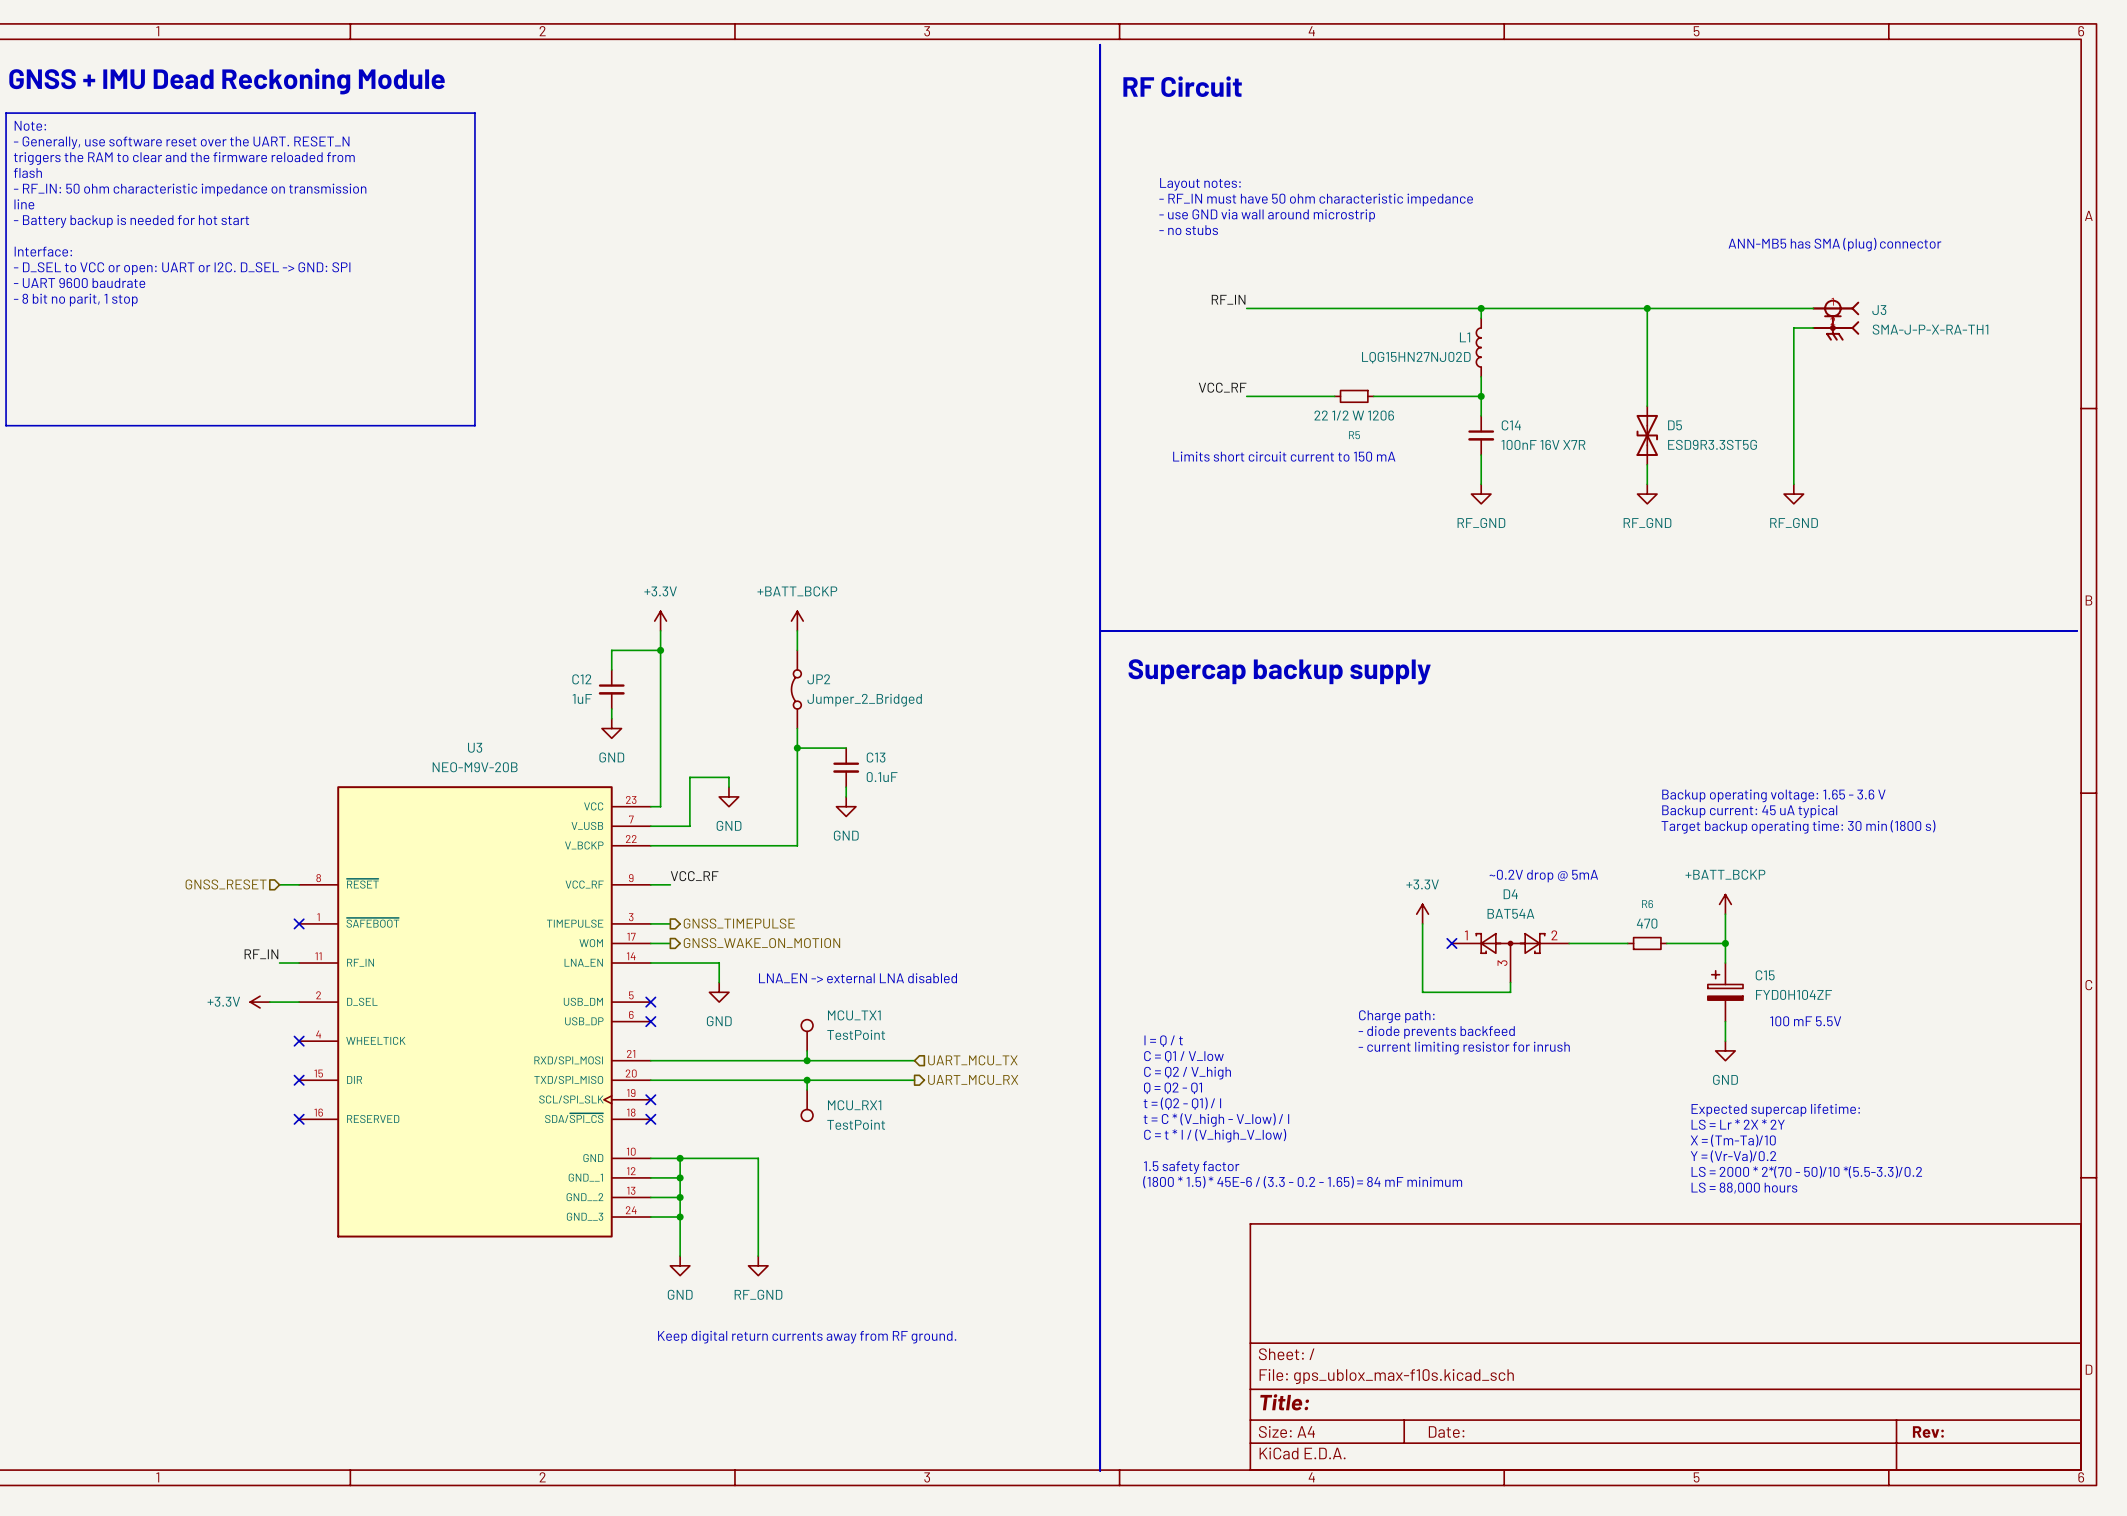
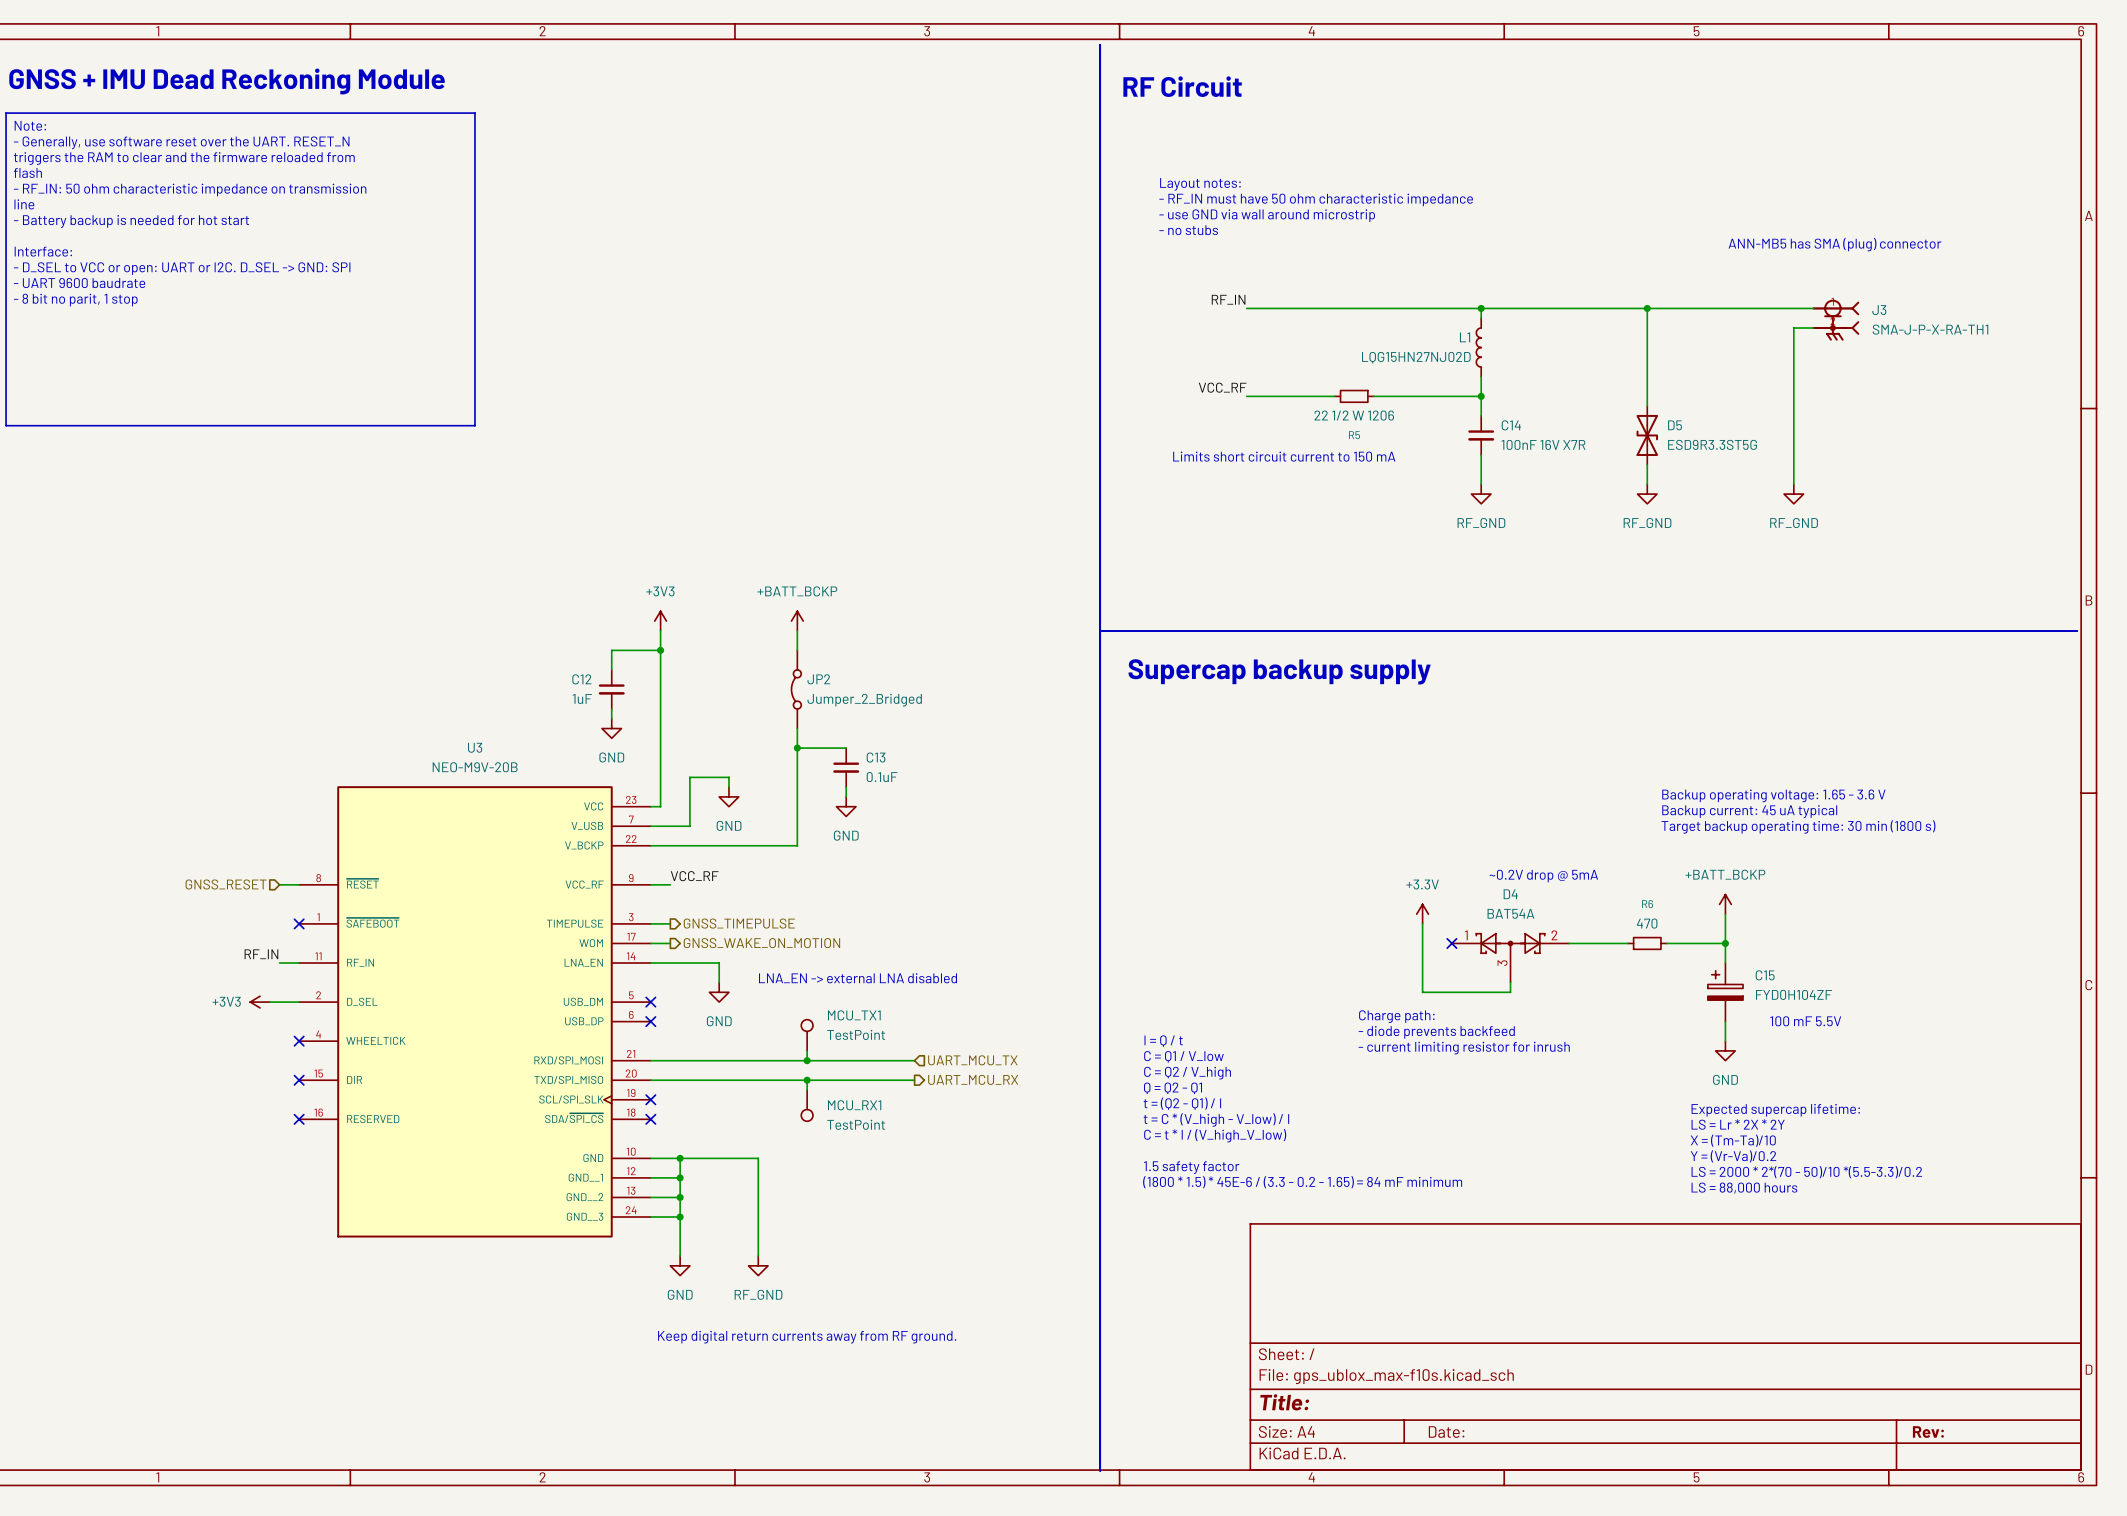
power symbol: +3.3V (660, 621) -> +3V3 (660, 621)
power symbol: +3.3V (260, 1002) -> +3V3 (260, 1002)

